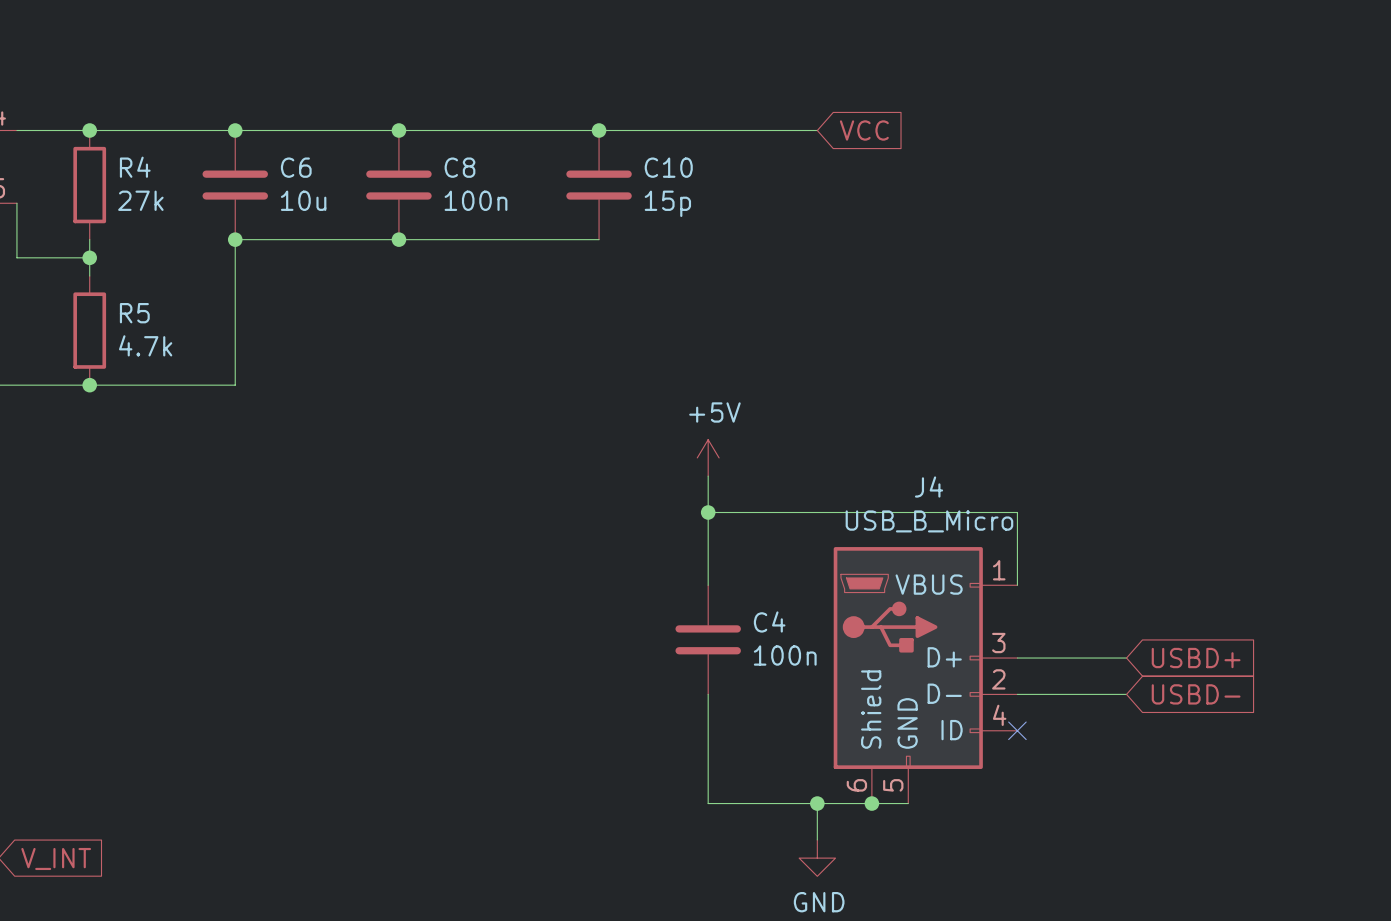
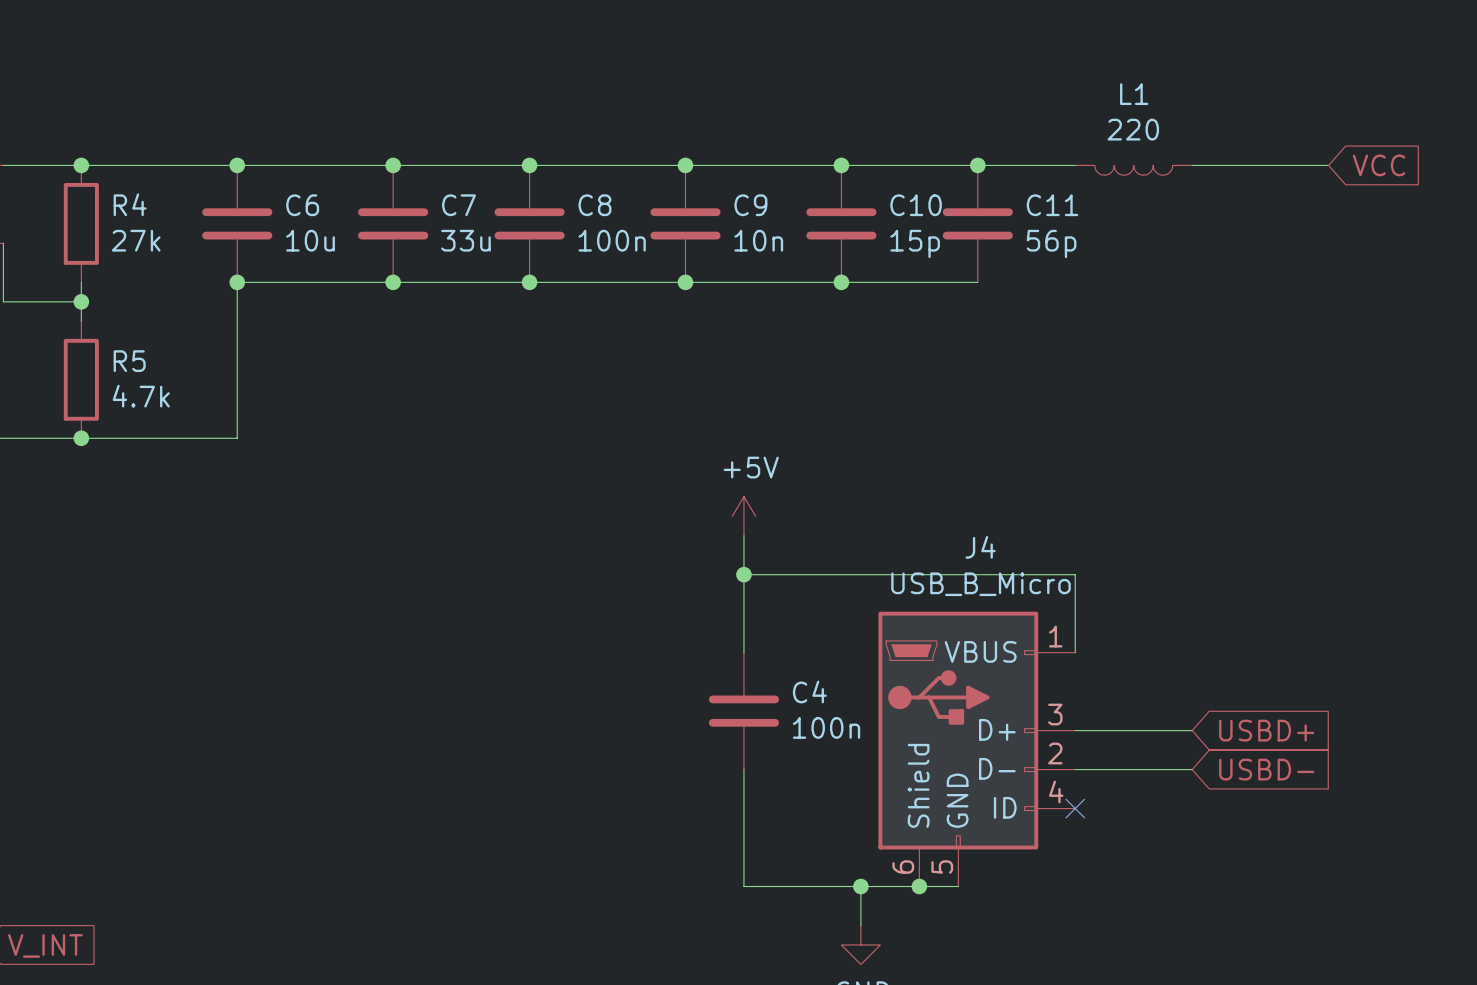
junction position: (398, 130) -> (393, 165)
junction: none -> (529, 165)
junction: (599, 130) -> none
junction: none -> (685, 165)
junction: none -> (841, 165)
wire: none -> (860, 165) (1075, 165)
global label: VCC (864, 130) -> none
junction: none -> (977, 165)
wire: none -> (1192, 165) (1328, 165)
global label: none -> VCC (1379, 165)
L1: none -> 220 (1133, 170)
C7: none -> 33u (393, 223)
C8 position: (398, 185) -> (529, 223)
C10 position: (599, 185) -> (841, 223)
C9: none -> 10n (685, 223)
C11: none -> 56p (977, 223)
junction position: (398, 239) -> (393, 282)
junction: none -> (529, 282)
wire: none -> (627, 282) (977, 282)
junction: none -> (685, 282)
junction: none -> (841, 282)

